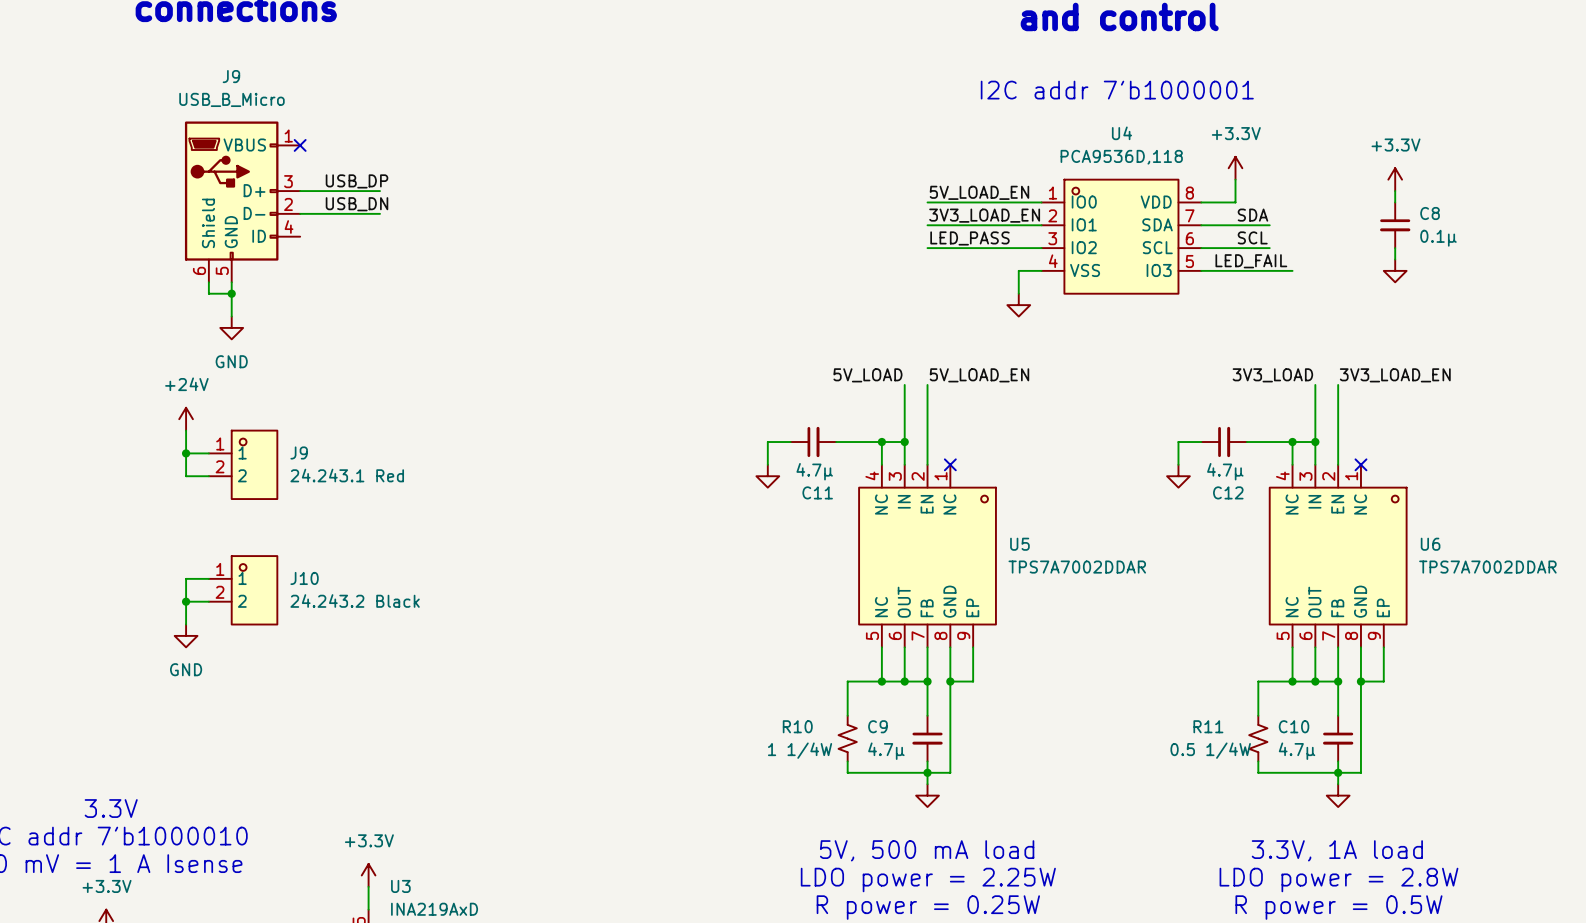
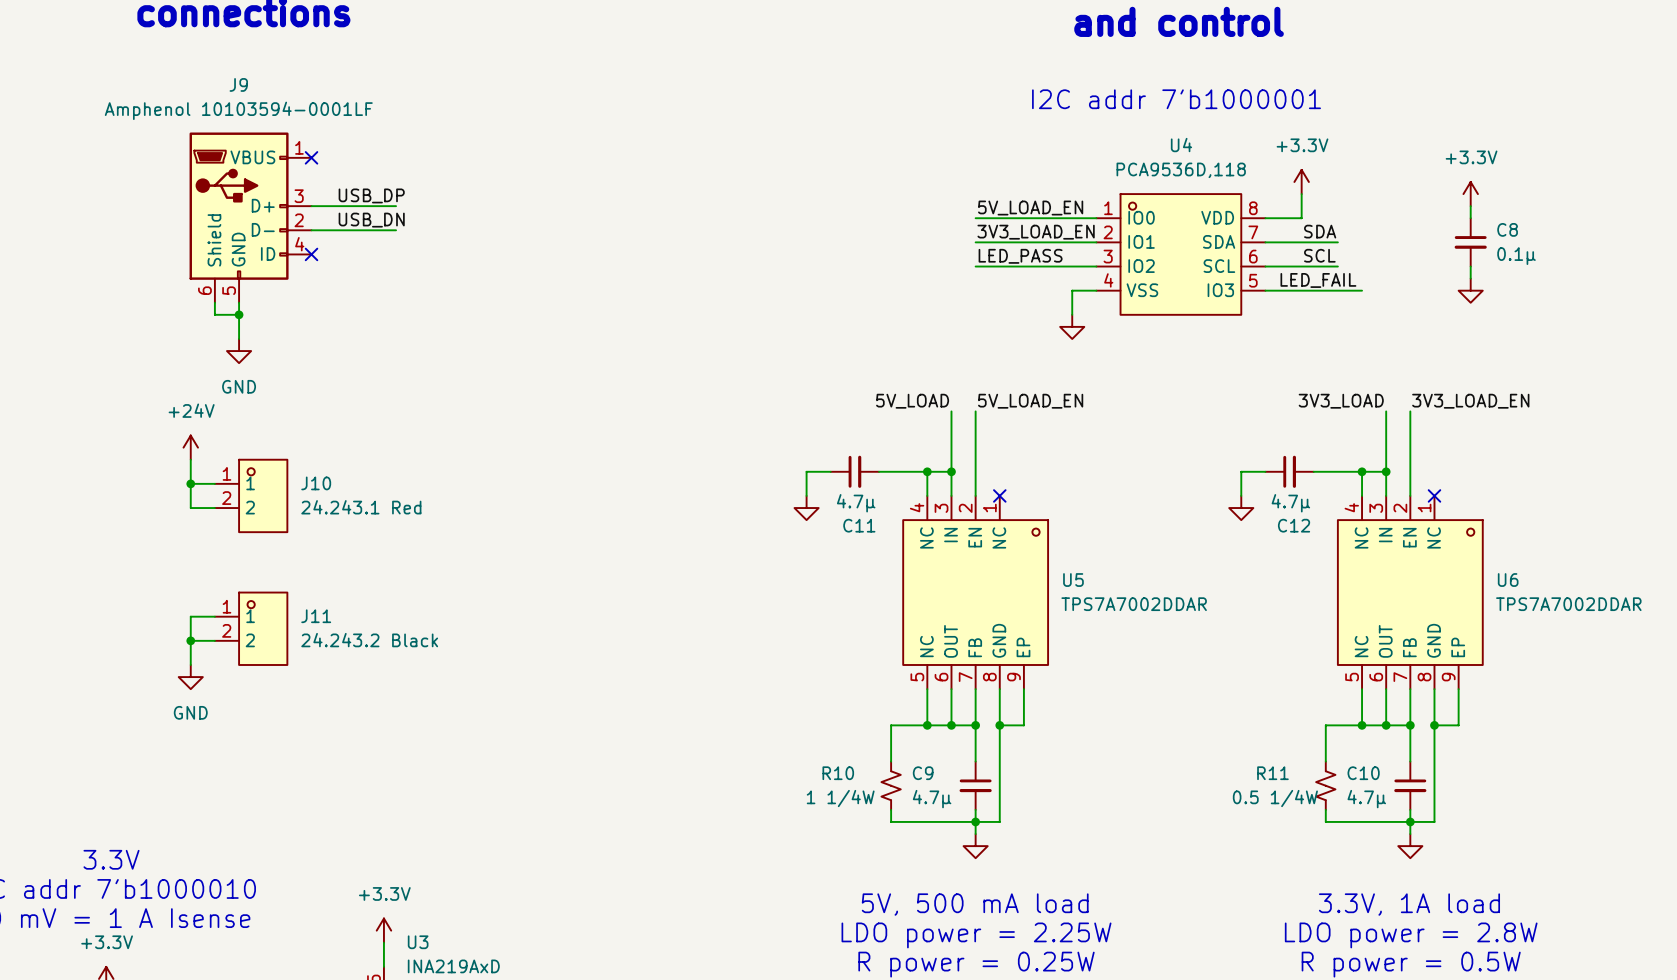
J9 value: USB_B_Micro (231, 99) -> Amphenol 10103594-0001LF (238, 110)
no-connect mark: none -> (311, 254)
J9 name: J9 (299, 452) -> J10 (316, 483)
J10 name: J10 (304, 578) -> J11 (316, 616)

